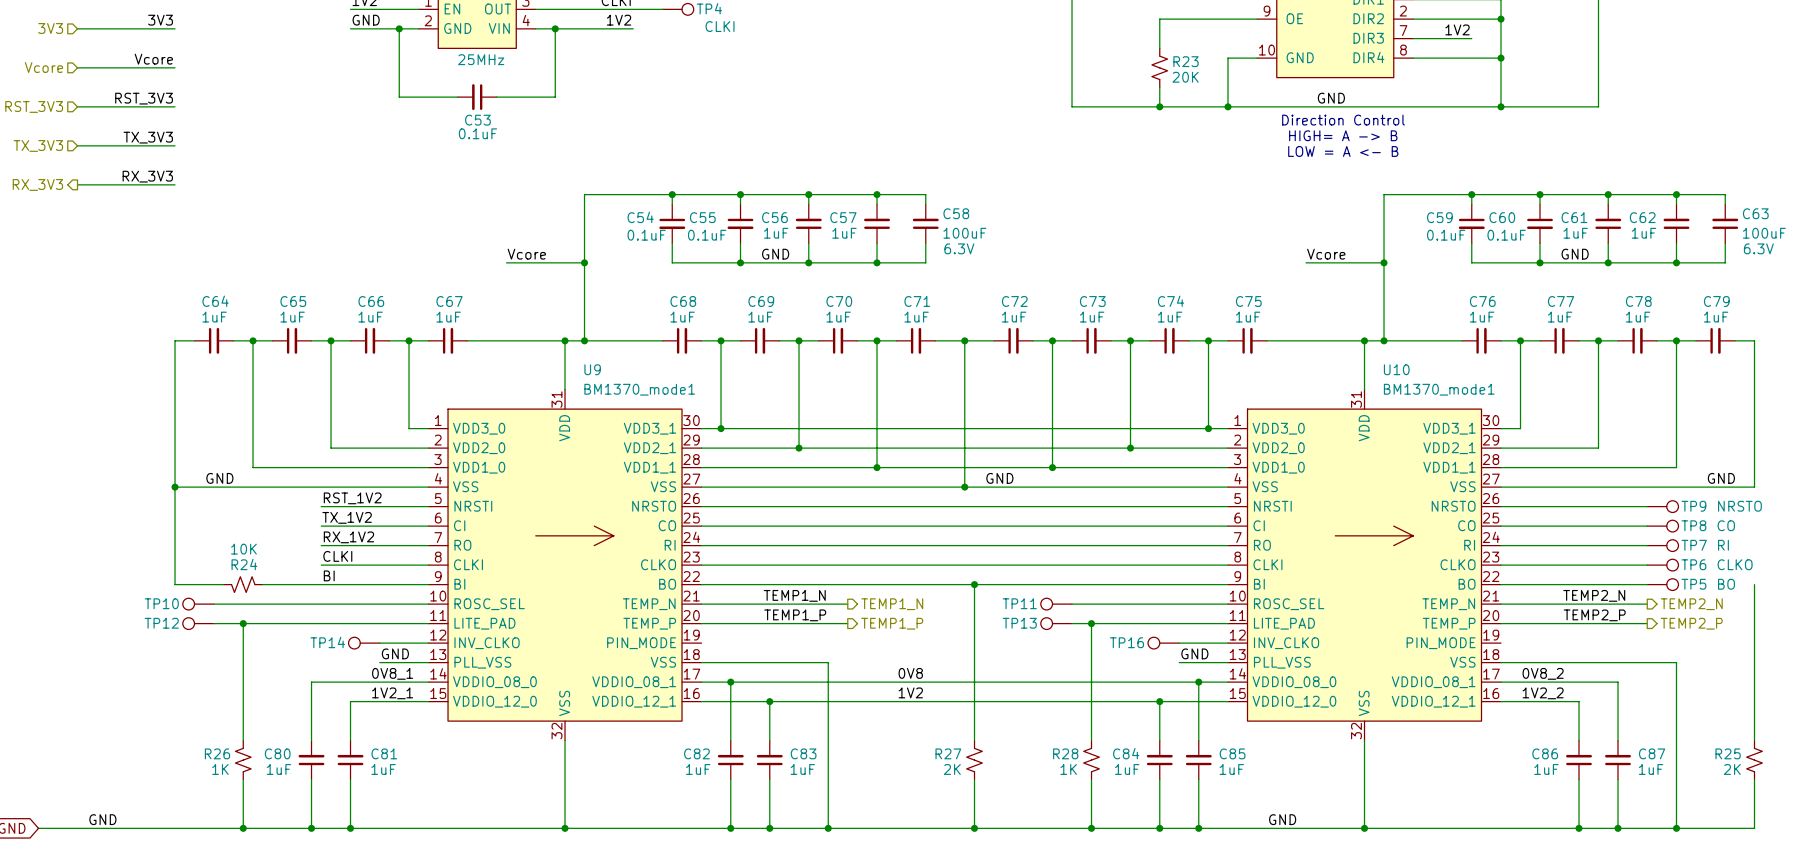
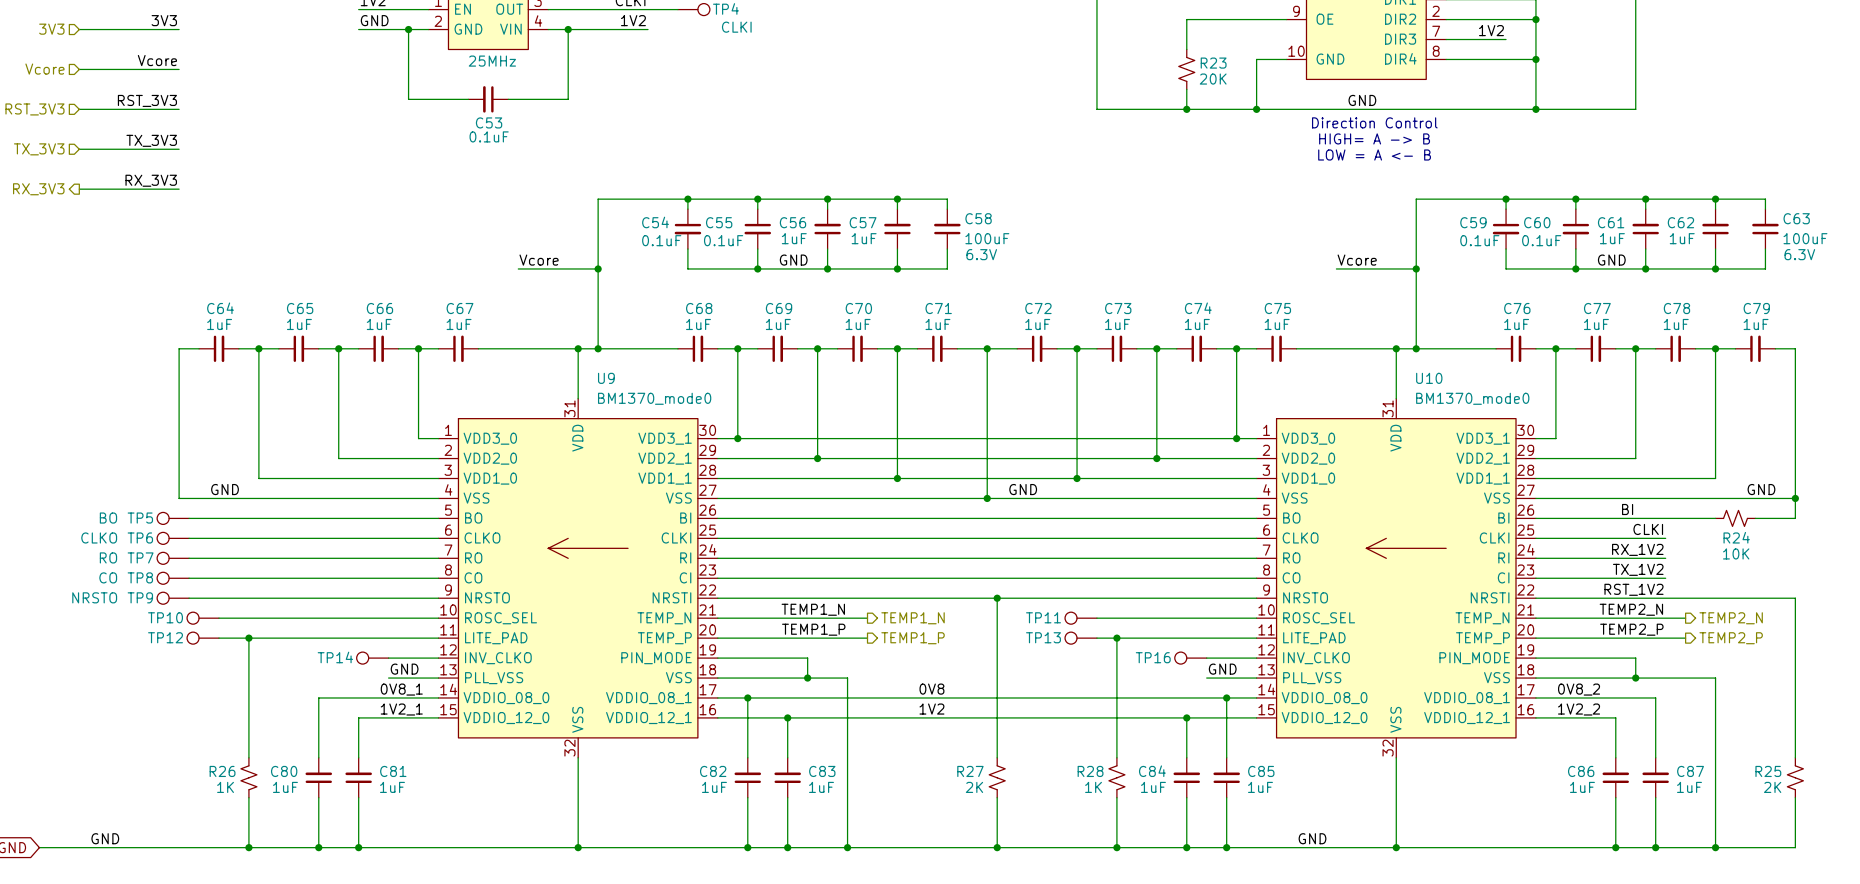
U9 symbol: [428, 389, 702, 741] -> [438, 398, 718, 758]
U9 value: BM1370_mode1 (639, 389) -> BM1370_mode0 (654, 398)
U10 symbol: [1228, 389, 1502, 741] -> [1256, 398, 1536, 758]
U10 value: BM1370_mode1 (1439, 389) -> BM1370_mode0 (1472, 398)
wire: (175, 487) (175, 584) (184, 584) -> none
junction: (175, 487) -> none
wire: none -> (1795, 498) (1795, 518) (1755, 518)
junction: none -> (1795, 498)
label: none -> BI (1627, 509)
label: RST_1V2 (352, 498) -> none
wire: none -> (189, 518) (328, 518)
TP9 position: (1662, 506) -> (173, 598)
TP9 rotation: 0° (1672, 506) -> 180° (163, 598)
label: TX_1V2 (347, 517) -> none
label: none -> CLKI (1648, 529)
wire: none -> (189, 538) (328, 538)
wire: (1627, 526) (1647, 526) -> none
TP8 position: (1662, 526) -> (173, 578)
TP8 rotation: 0° (1672, 526) -> 180° (163, 578)
label: RX_1V2 (348, 537) -> none
label: none -> RX_1V2 (1637, 549)
wire: none -> (189, 558) (328, 558)
wire: (1627, 545) (1647, 545) -> none
TP7 position: (1662, 545) -> (173, 558)
TP7 rotation: 0° (1672, 545) -> 180° (163, 558)
TP7 value: RI (1723, 545) -> RO (108, 557)
R24 value position: 10K (243, 549) -> 10K (1736, 553)
label: CLKI (337, 556) -> none
label: none -> TX_1V2 (1638, 569)
R24 name position: R24 (244, 564) -> R24 (1736, 537)
wire: none -> (189, 578) (328, 578)
wire: (1627, 565) (1647, 565) -> none
TP6 position: (1662, 565) -> (173, 538)
TP6 rotation: 0° (1672, 565) -> 180° (163, 538)
label: BI (329, 575) -> none
label: none -> RST_1V2 (1633, 589)
R24 flip: as is (243, 584) -> left-right (1735, 518)
R24 position: (243, 584) -> (1735, 518)
wire: none -> (1685, 598) (1795, 598)
TP5 position: (1662, 584) -> (173, 518)
TP5 rotation: 0° (1672, 584) -> 180° (163, 518)
wire: none -> (717, 658) (807, 658) (807, 678)
wire: none -> (1535, 658) (1635, 658) (1635, 678)
junction: none -> (807, 678)
junction: none -> (1635, 678)

